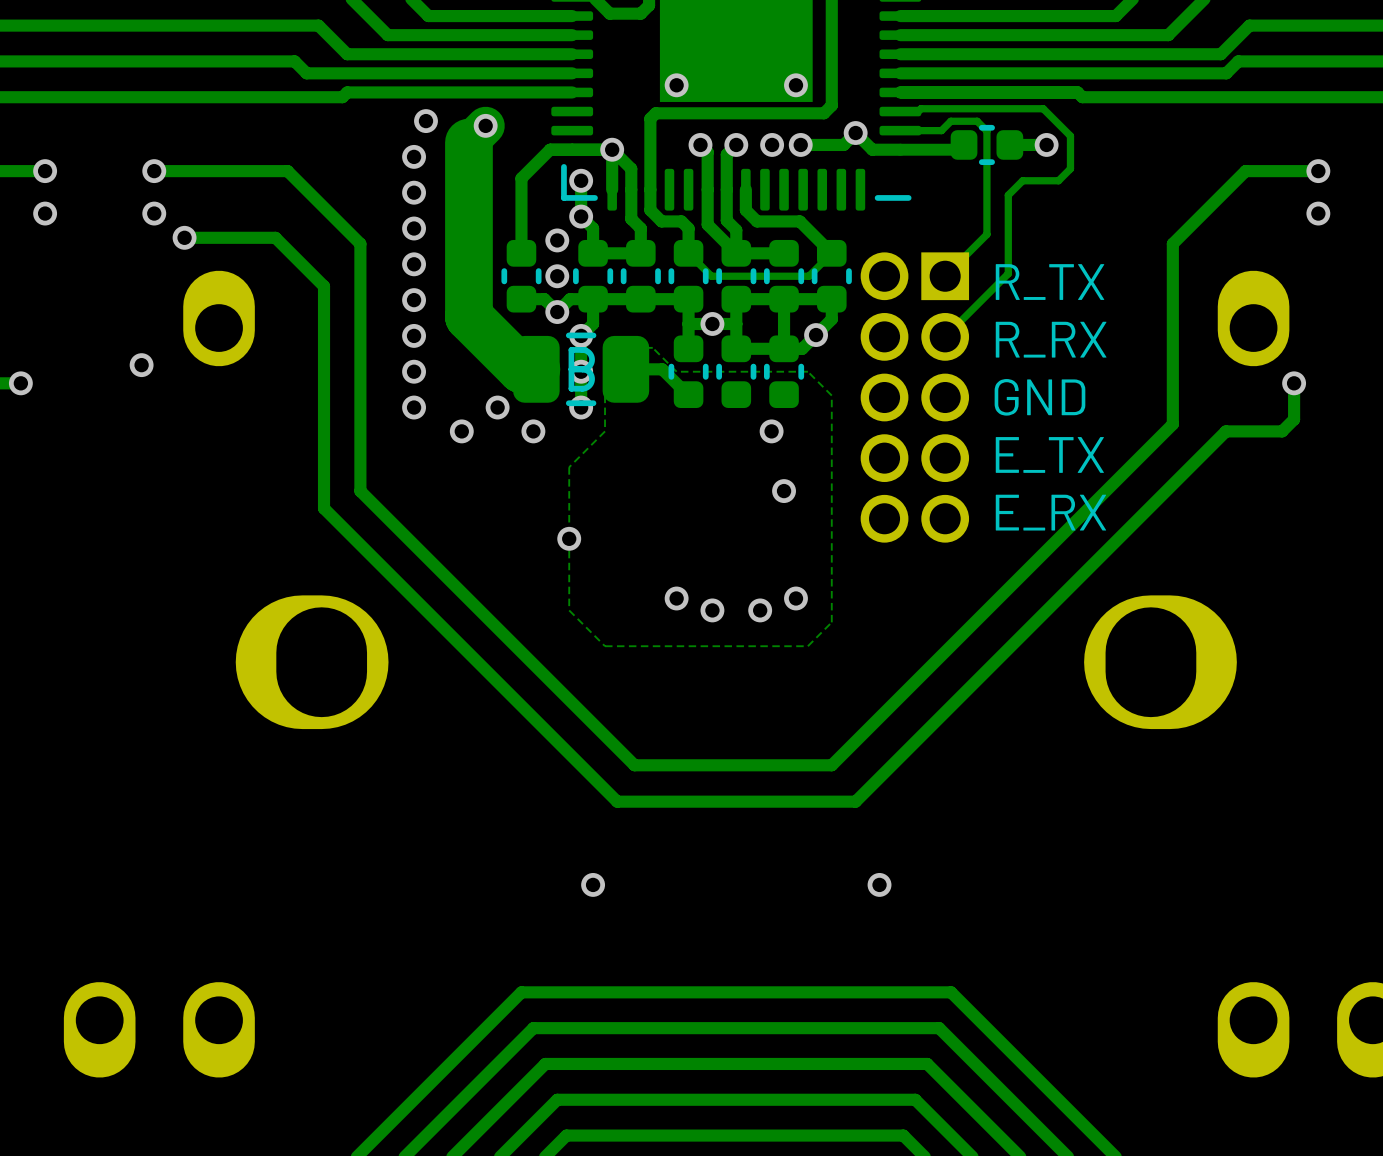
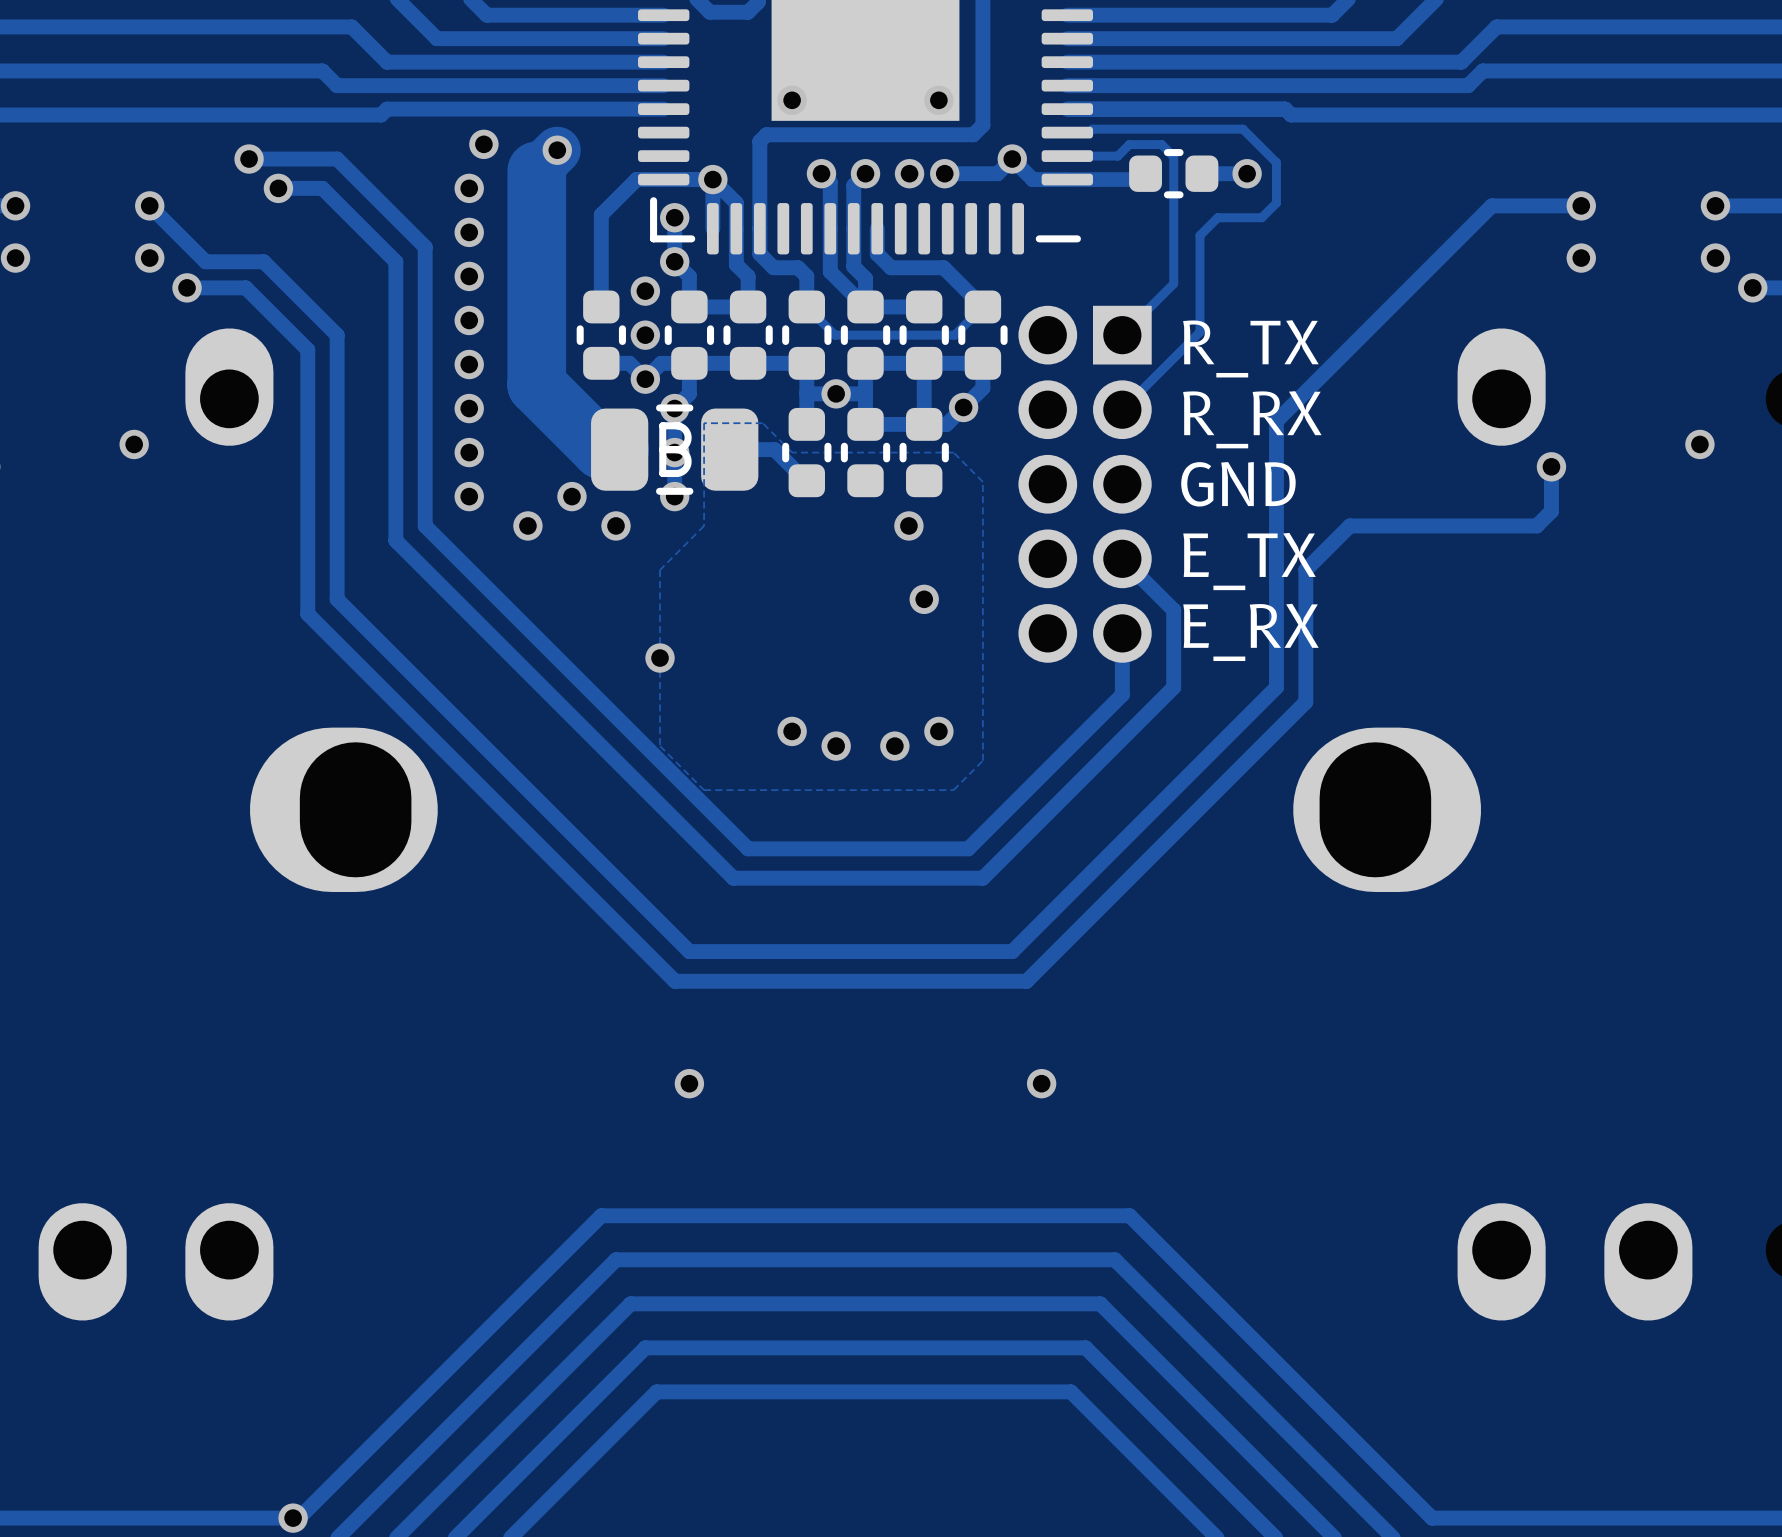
track: none -> (249, 159) (337, 159) (425, 247) (425, 525) (748, 848) (968, 848) (1122, 694) (1122, 633)
via: none -> (249, 159)
track: none -> (278, 188) (322, 188) (395, 261) (395, 540) (733, 878) (982, 878) (1173, 687) (1173, 610) (1122, 558)
via: none -> (278, 188)
track: (154, 171) (287, 171) (360, 243) (360, 491) (634, 765) (831, 765) (1172, 424) (1172, 243) -> (689, 951) (1012, 951) (1276, 687) (1276, 421) (1402, 295)
track: (232, 237) (275, 237) (324, 286) (324, 508) -> (149, 205) (205, 261) (263, 261) (337, 335) (337, 599) (358, 620)
track: (1225, 431) (855, 801) -> (1467, 525) (1349, 525) (1305, 569) (1305, 702) (1026, 981) (1012, 981)
track: (593, 777) (617, 801) -> (245, 287) (307, 349) (307, 614) (675, 981) (719, 981)

